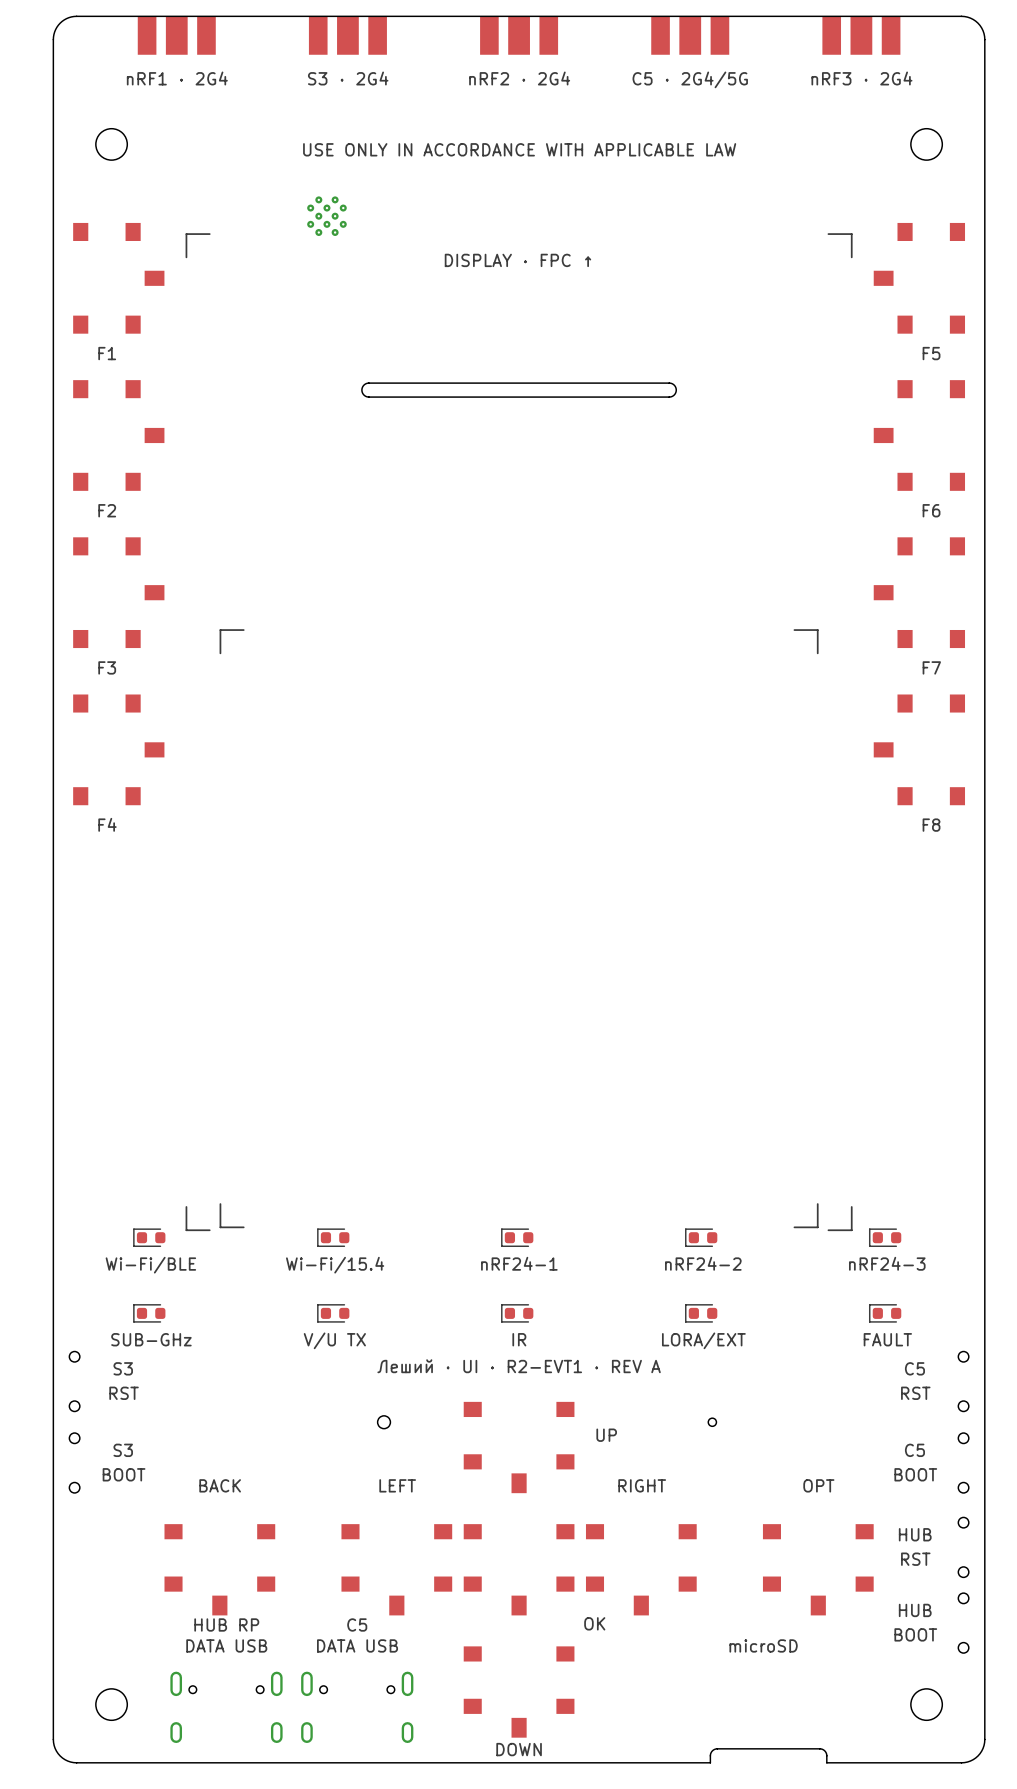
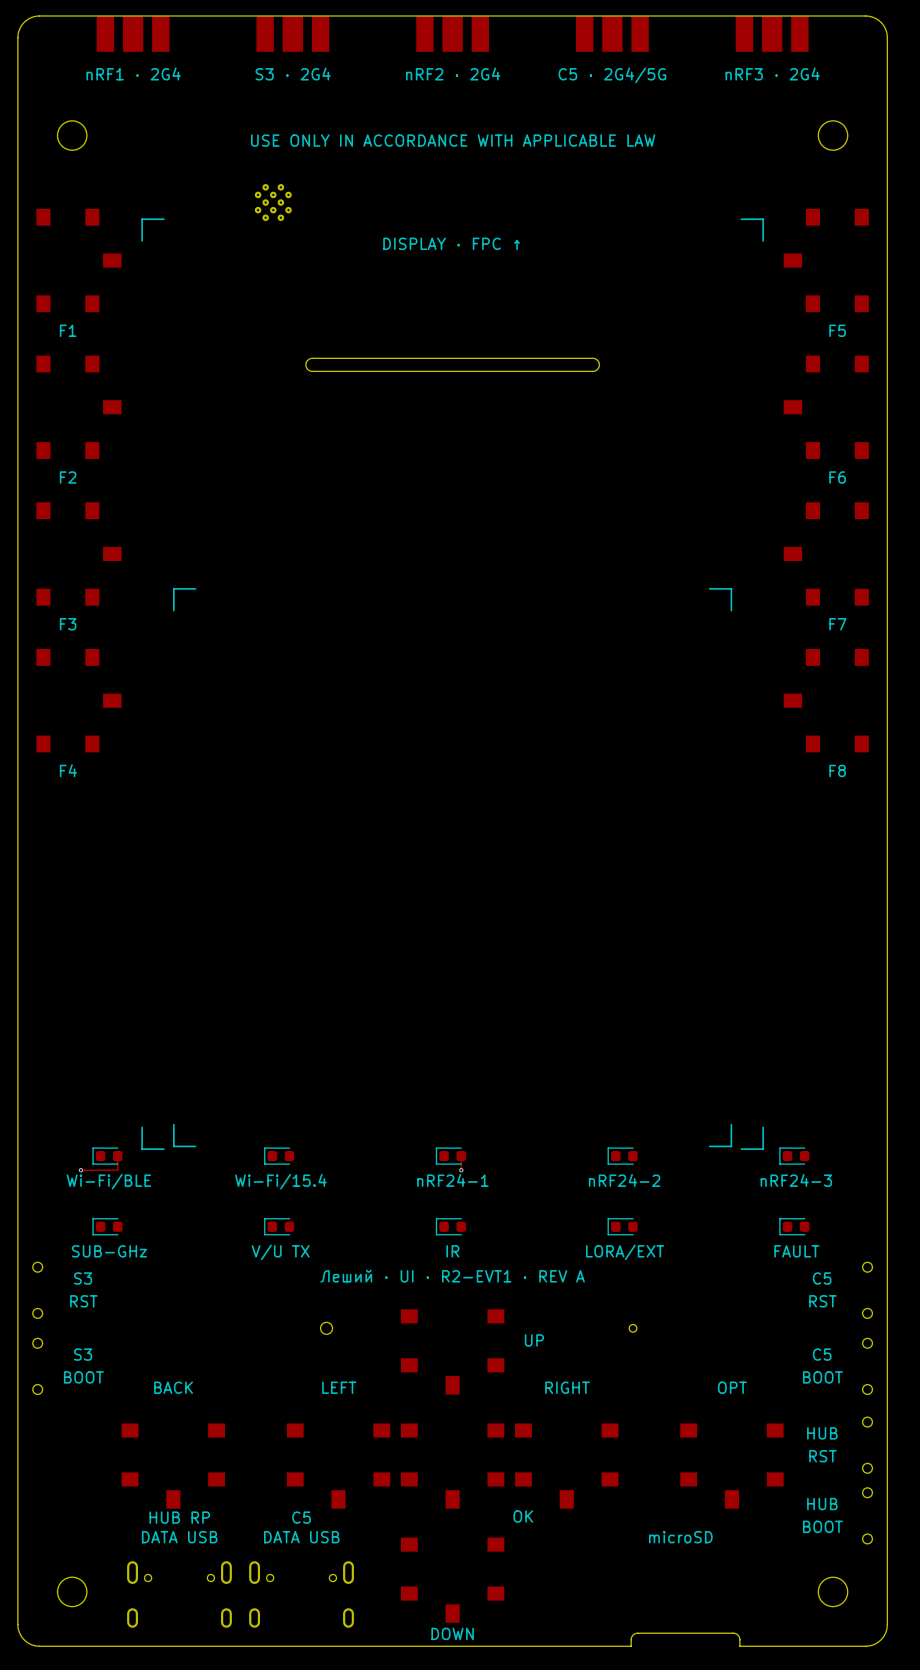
track: none -> (117, 1156) (117, 1170) (80, 1170)
track: none -> (461, 1156) (461, 1170)
via: none -> (80, 1170)
via: none -> (461, 1170)

